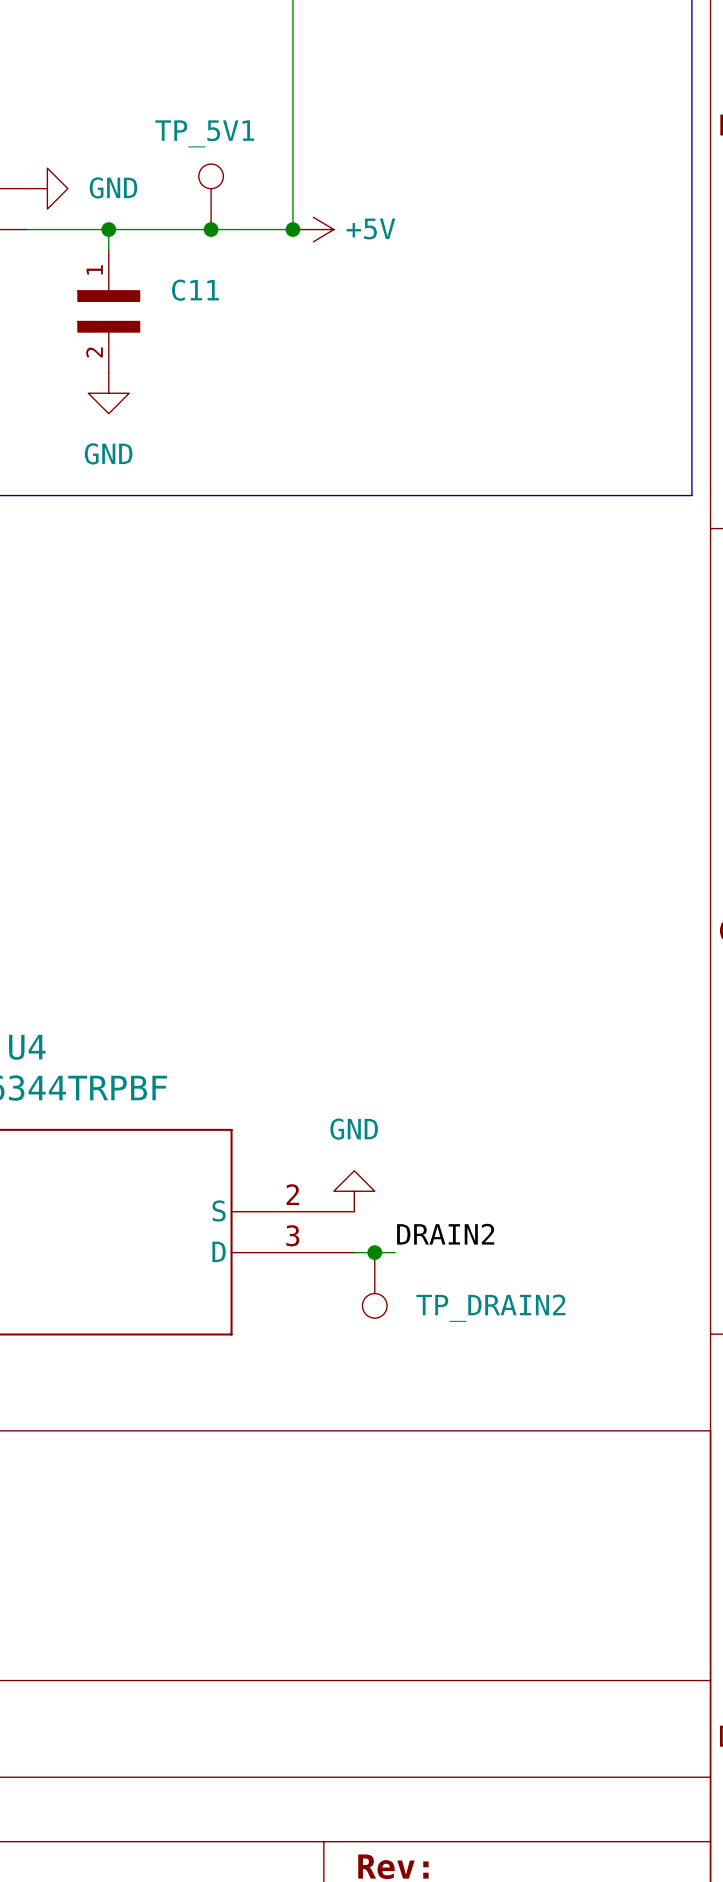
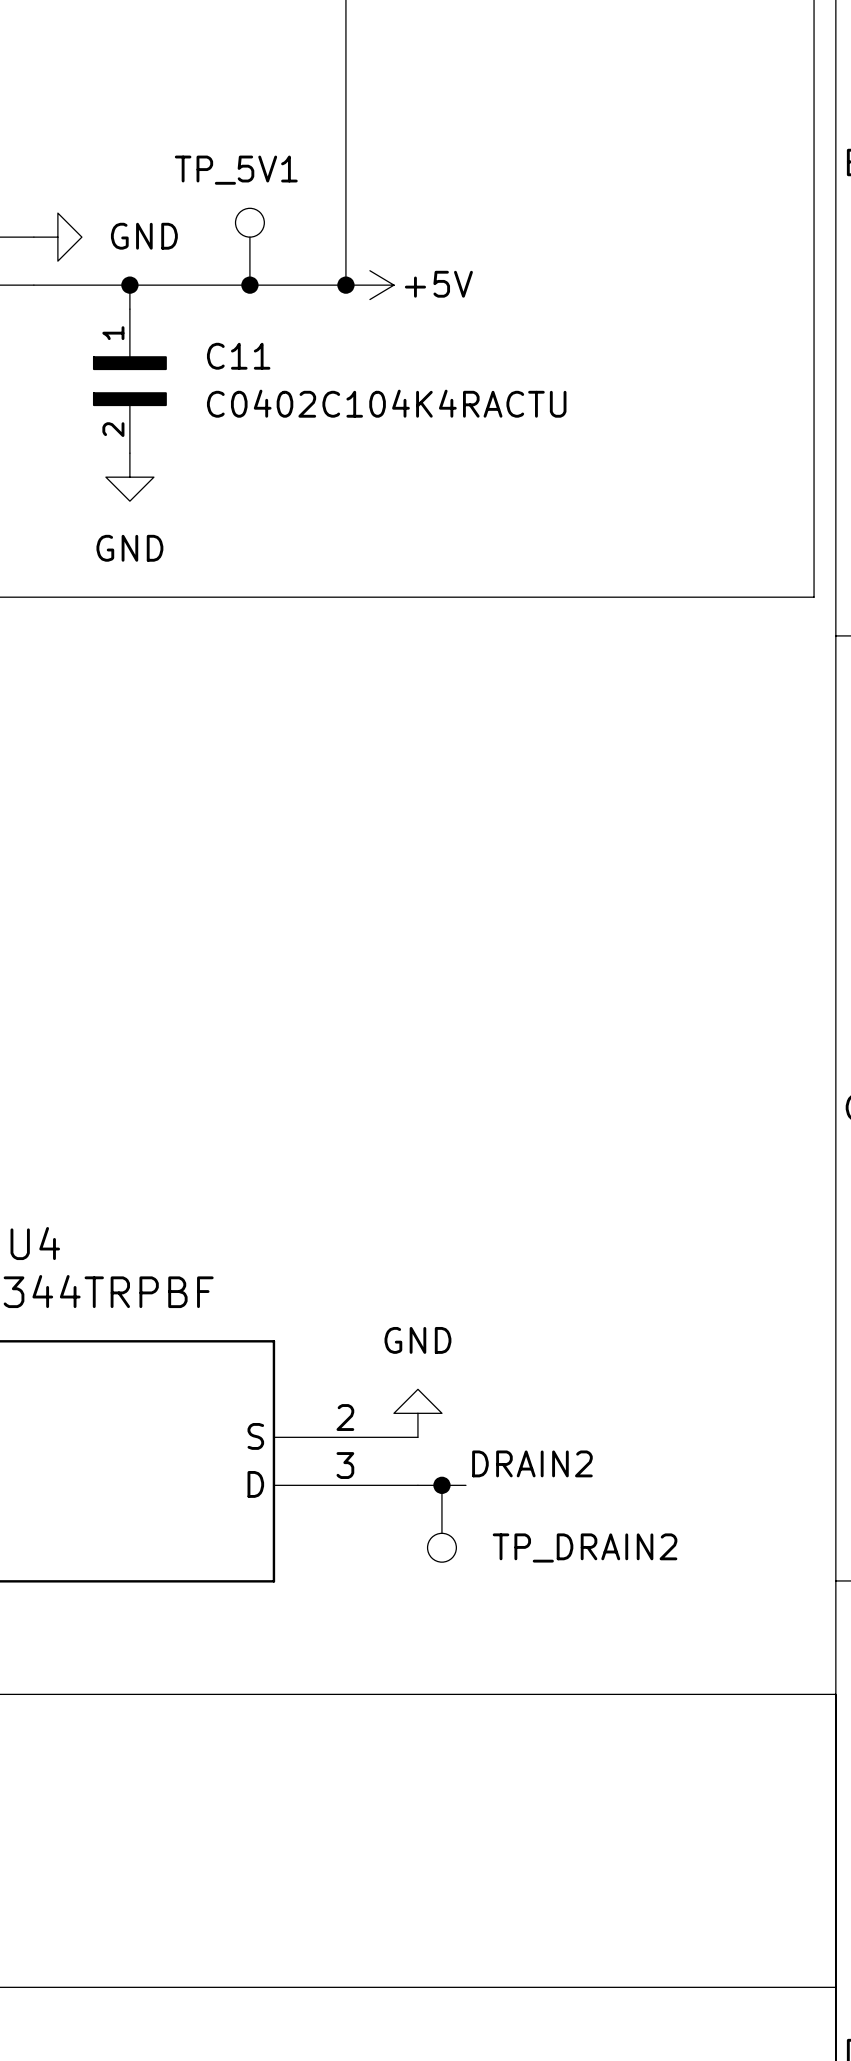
C11 value: none -> C0402C104K4RACTU (386, 403)

